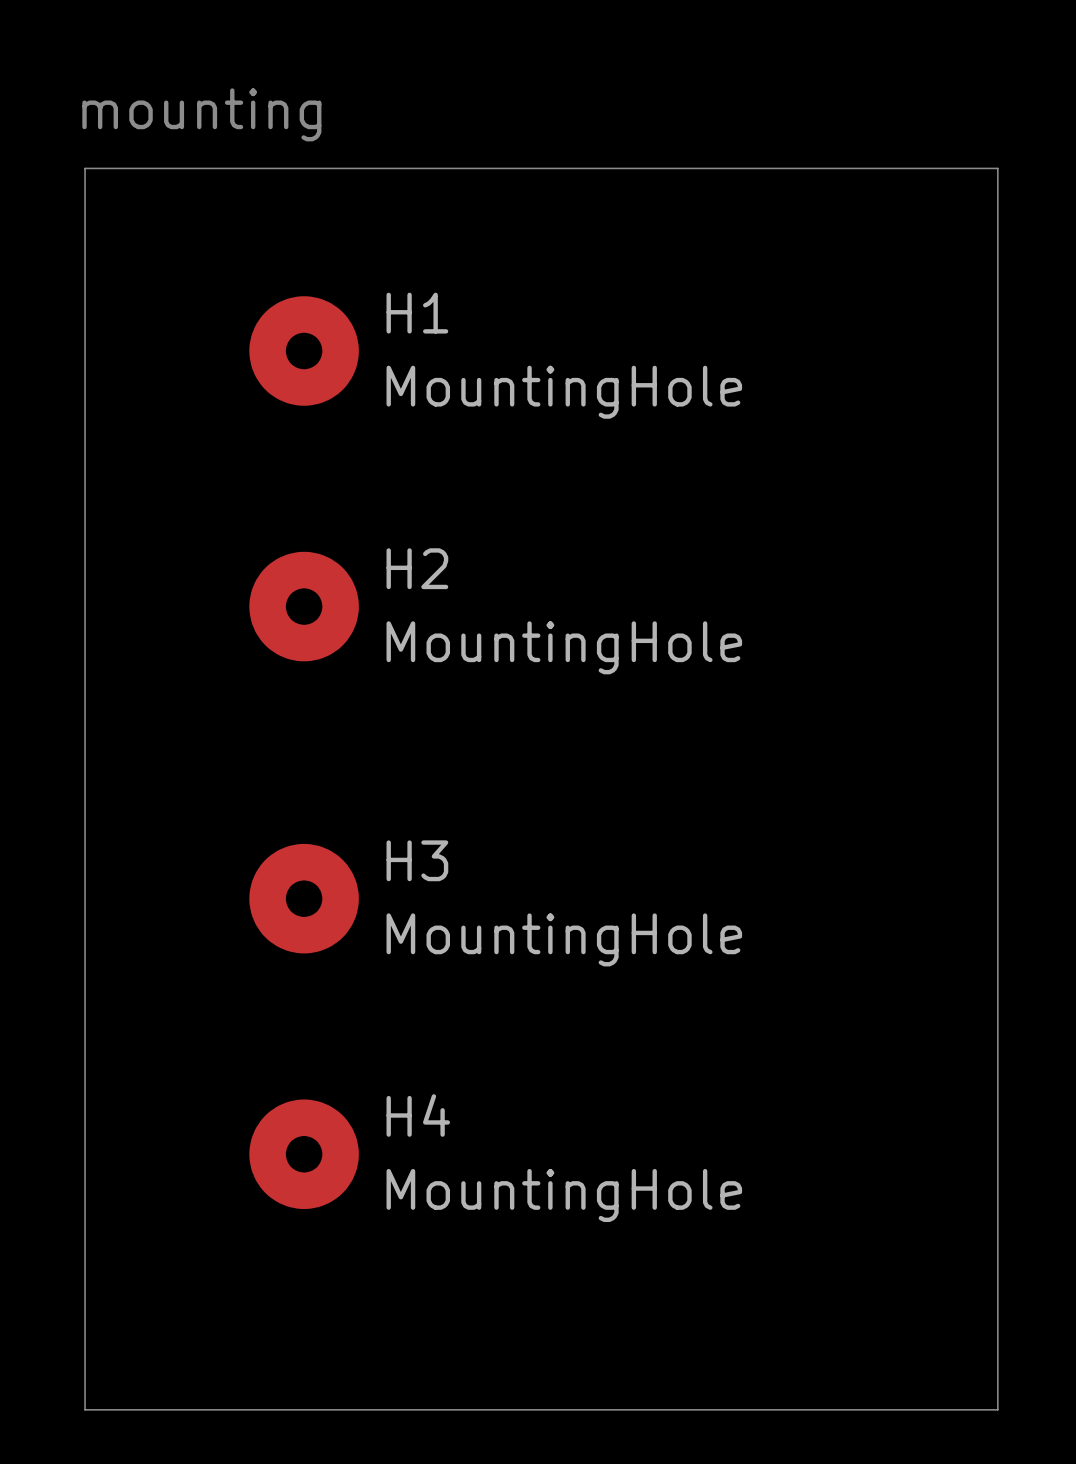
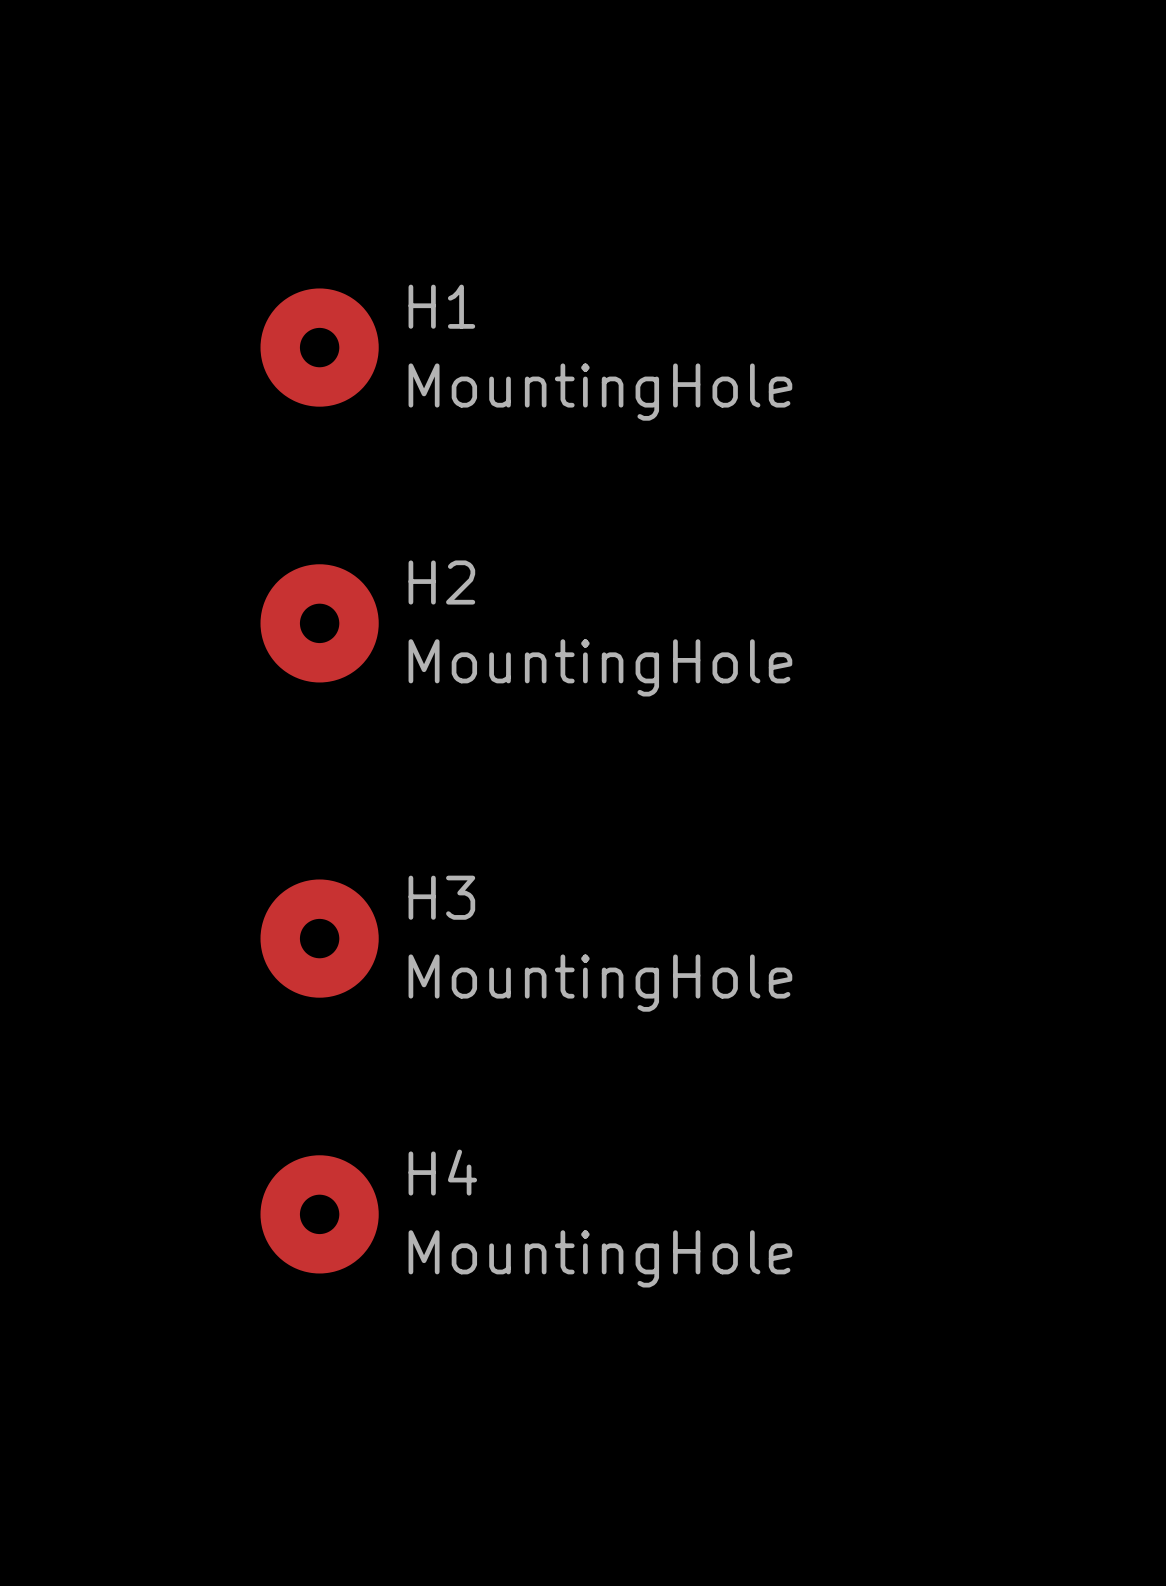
text: mounting (201, 114) -> none
line: (85, 168) (997, 168) (997, 1409) (85, 1409) (85, 168) -> none

